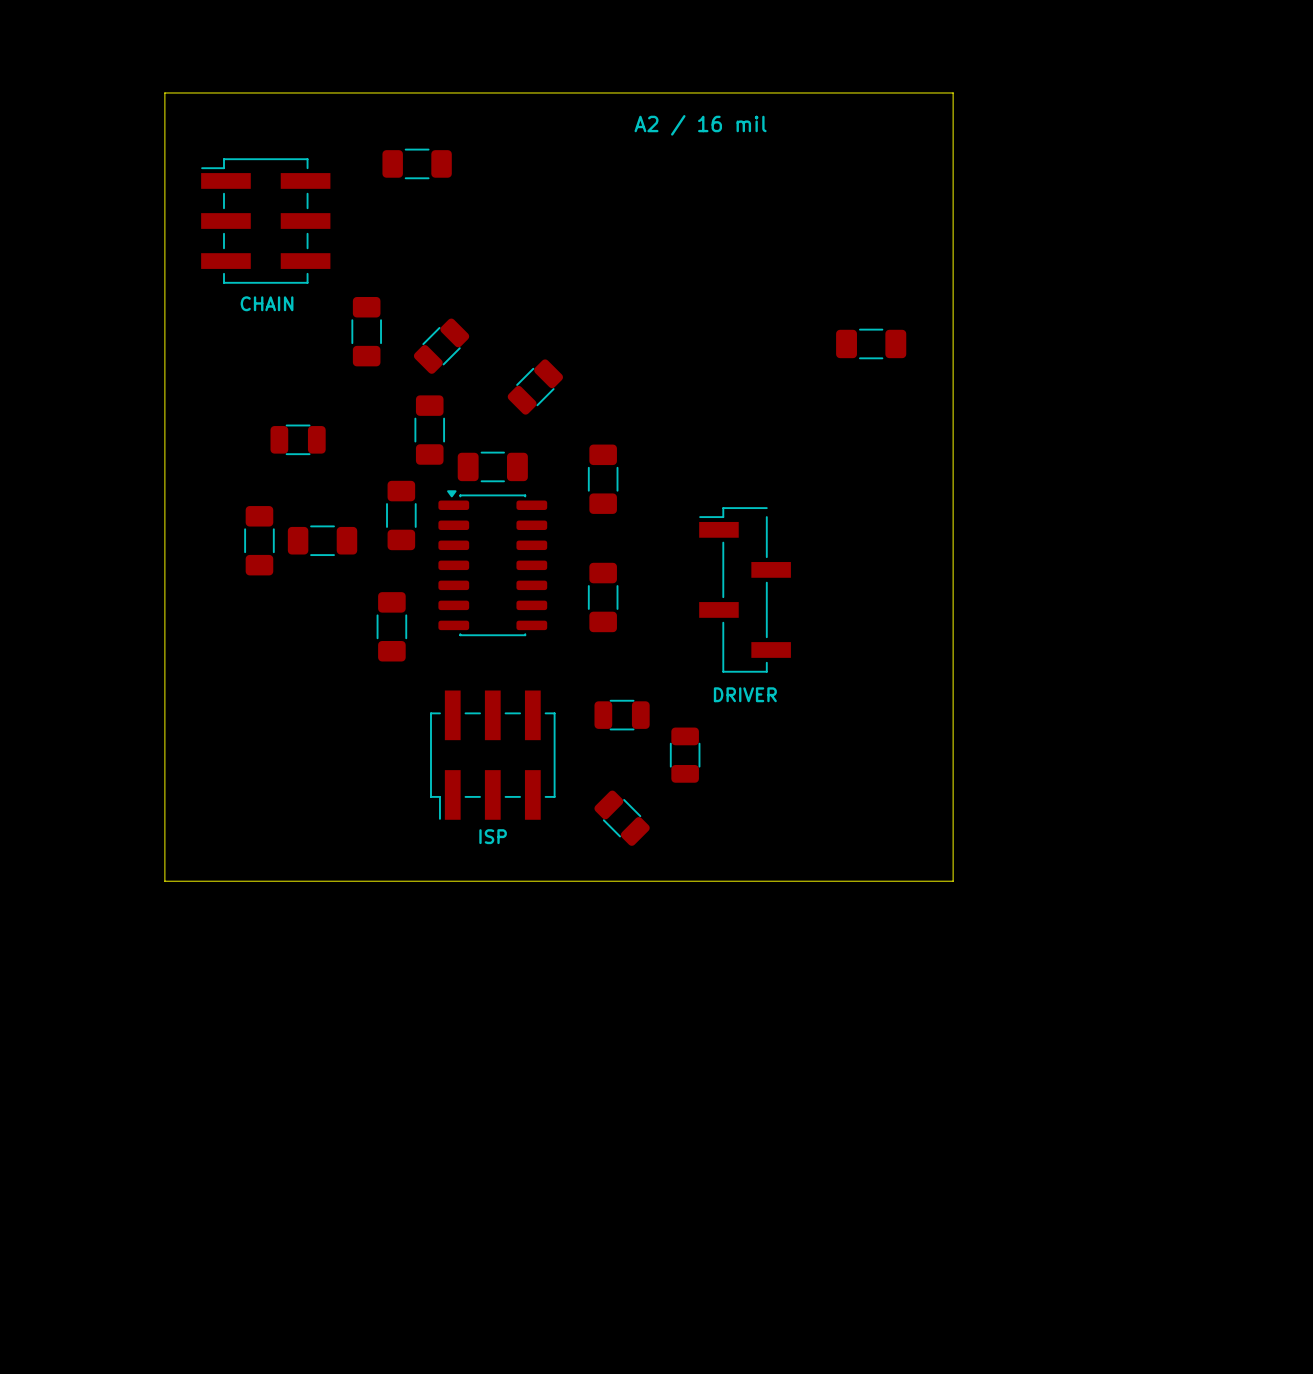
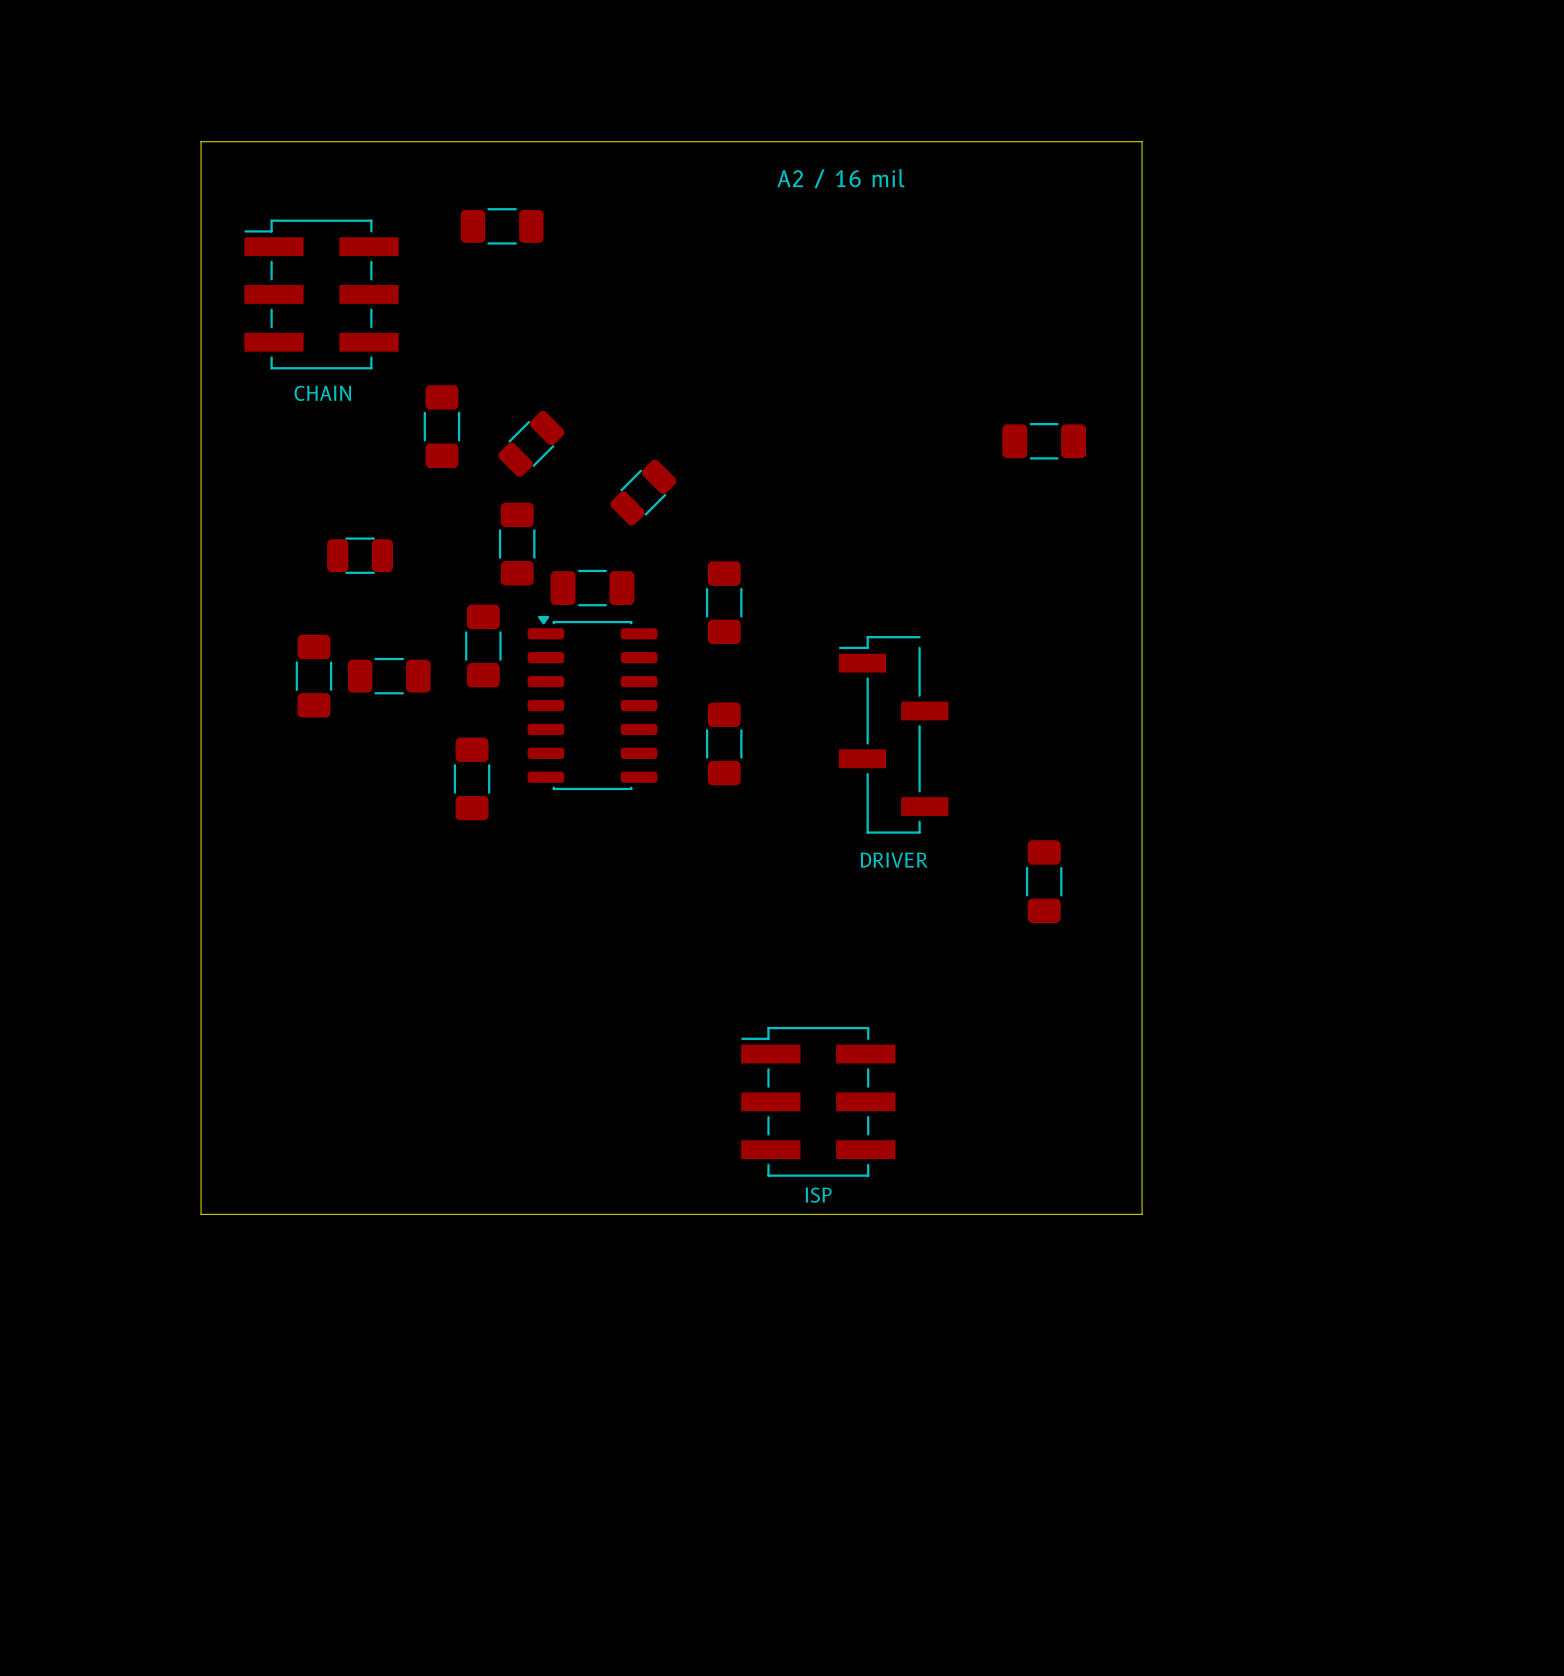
part: none -> (1044, 881)
part: (622, 715) -> none
part rotation: 0° (492, 755) -> 90° clockwise (818, 1101)
part position: (492, 755) -> (818, 1101)
part: (685, 755) -> none
part: (622, 818) -> none
text position: ISP (493, 836) -> ISP (818, 1195)
board edge: (164, 881) (953, 881) -> (201, 1082) (201, 1214) (1142, 1214) (1142, 1082)

